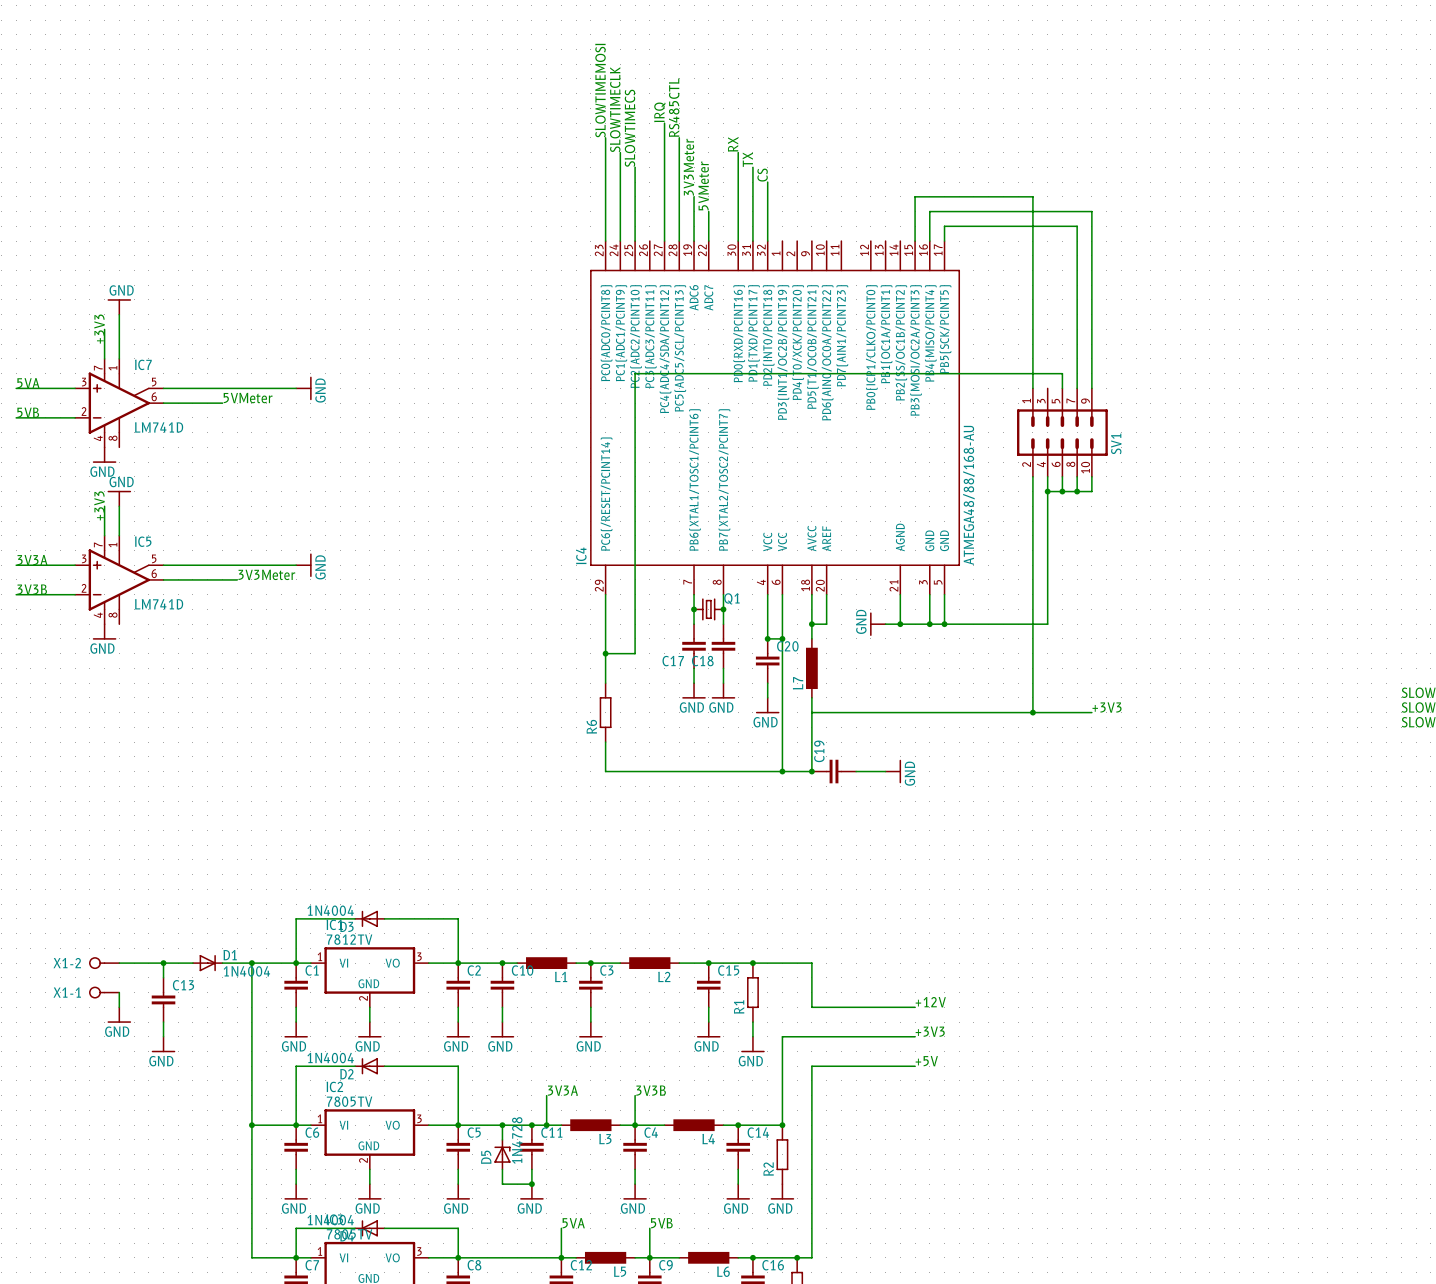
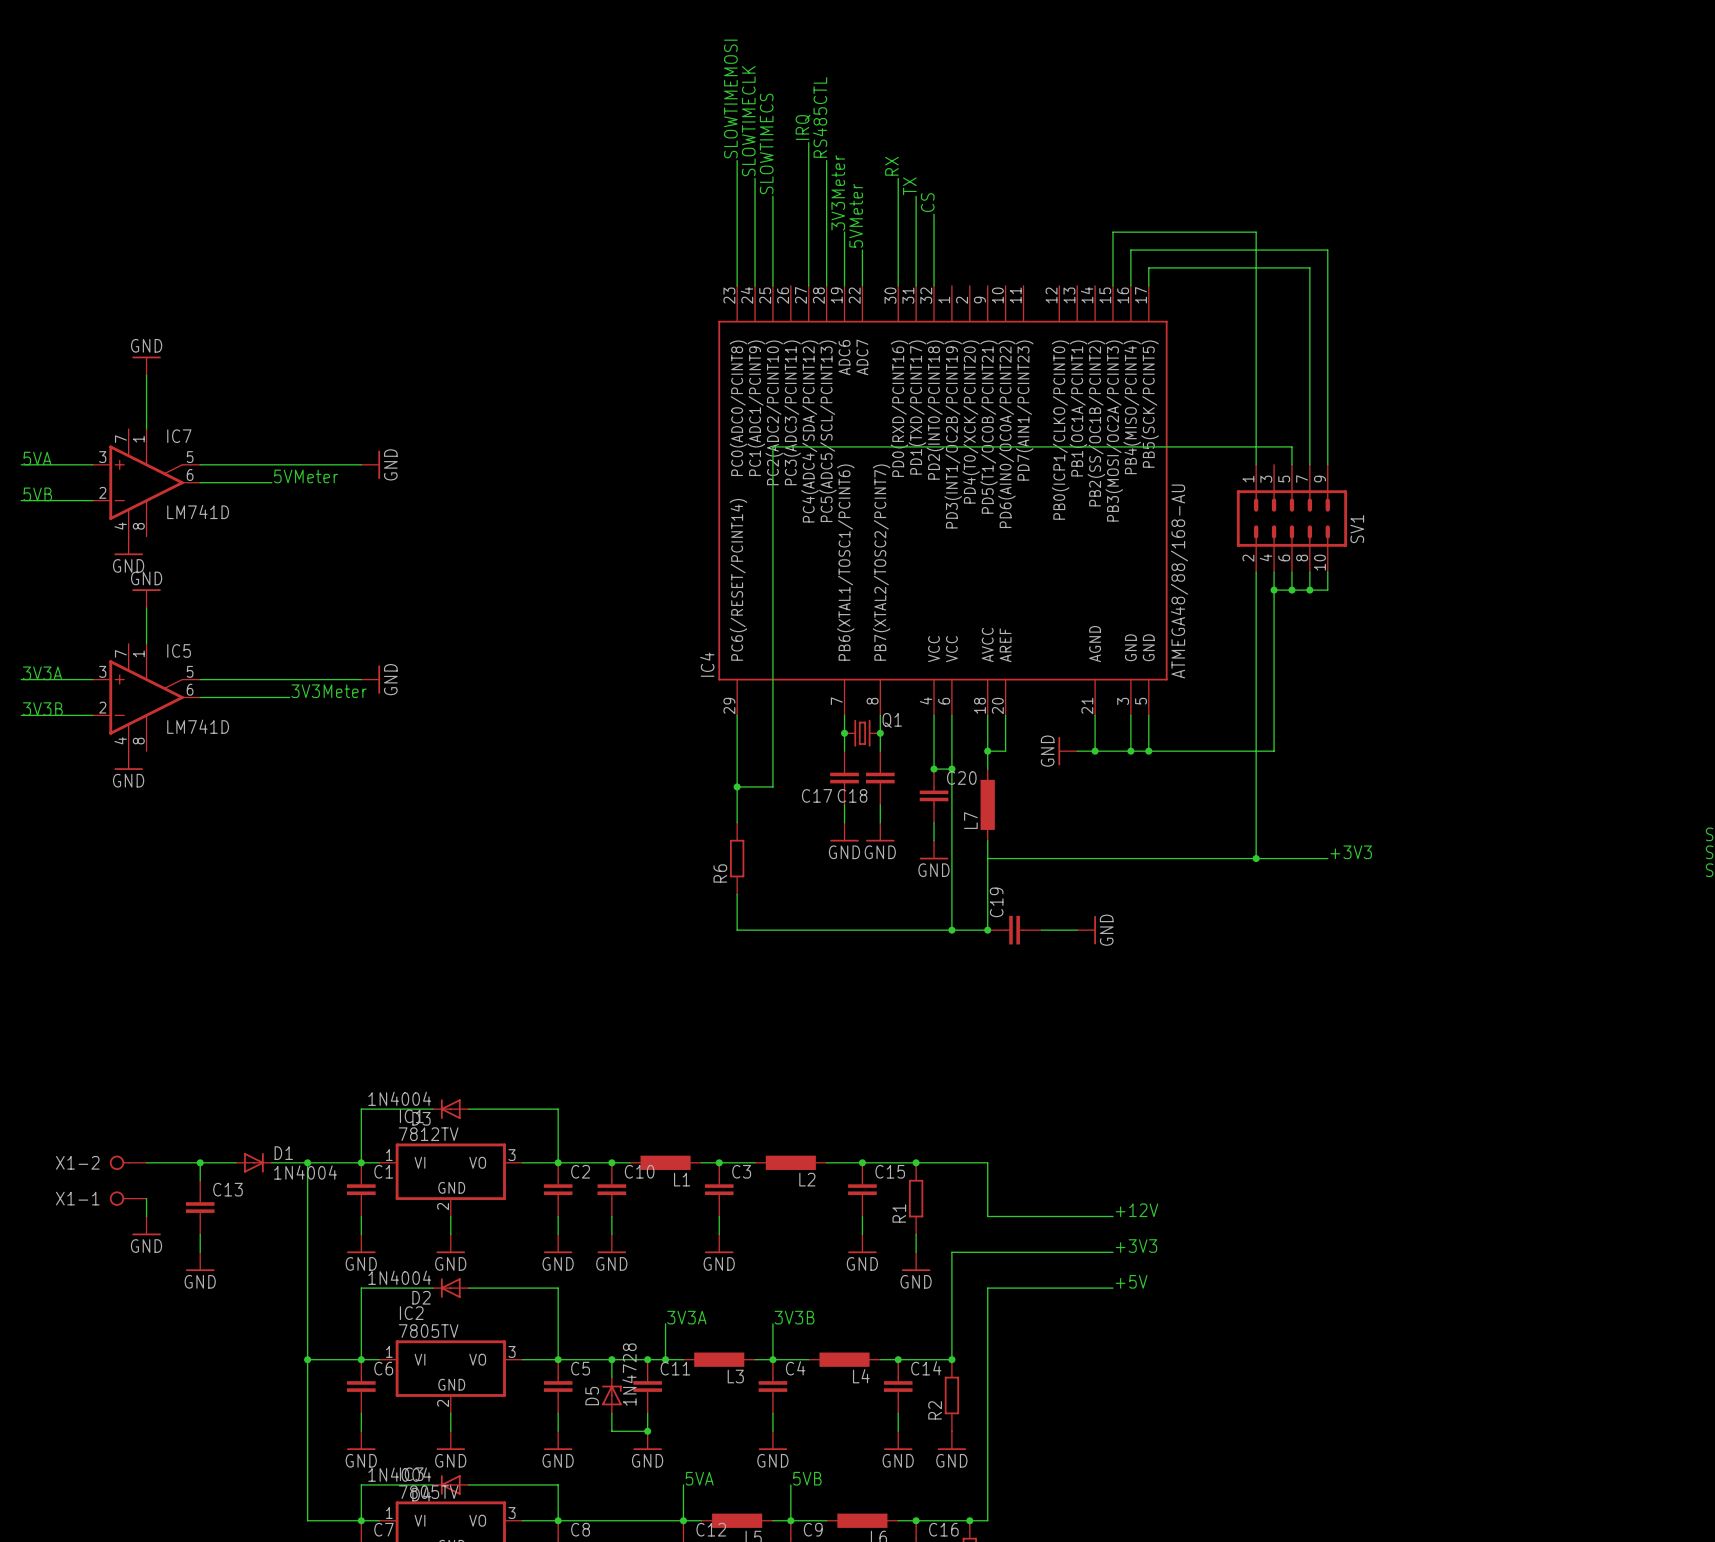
text: +3V3 (99, 329) -> none
wire: (104, 329) (104, 358) -> none
text: +3V3 (99, 505) -> none
wire: (104, 506) (104, 535) -> none

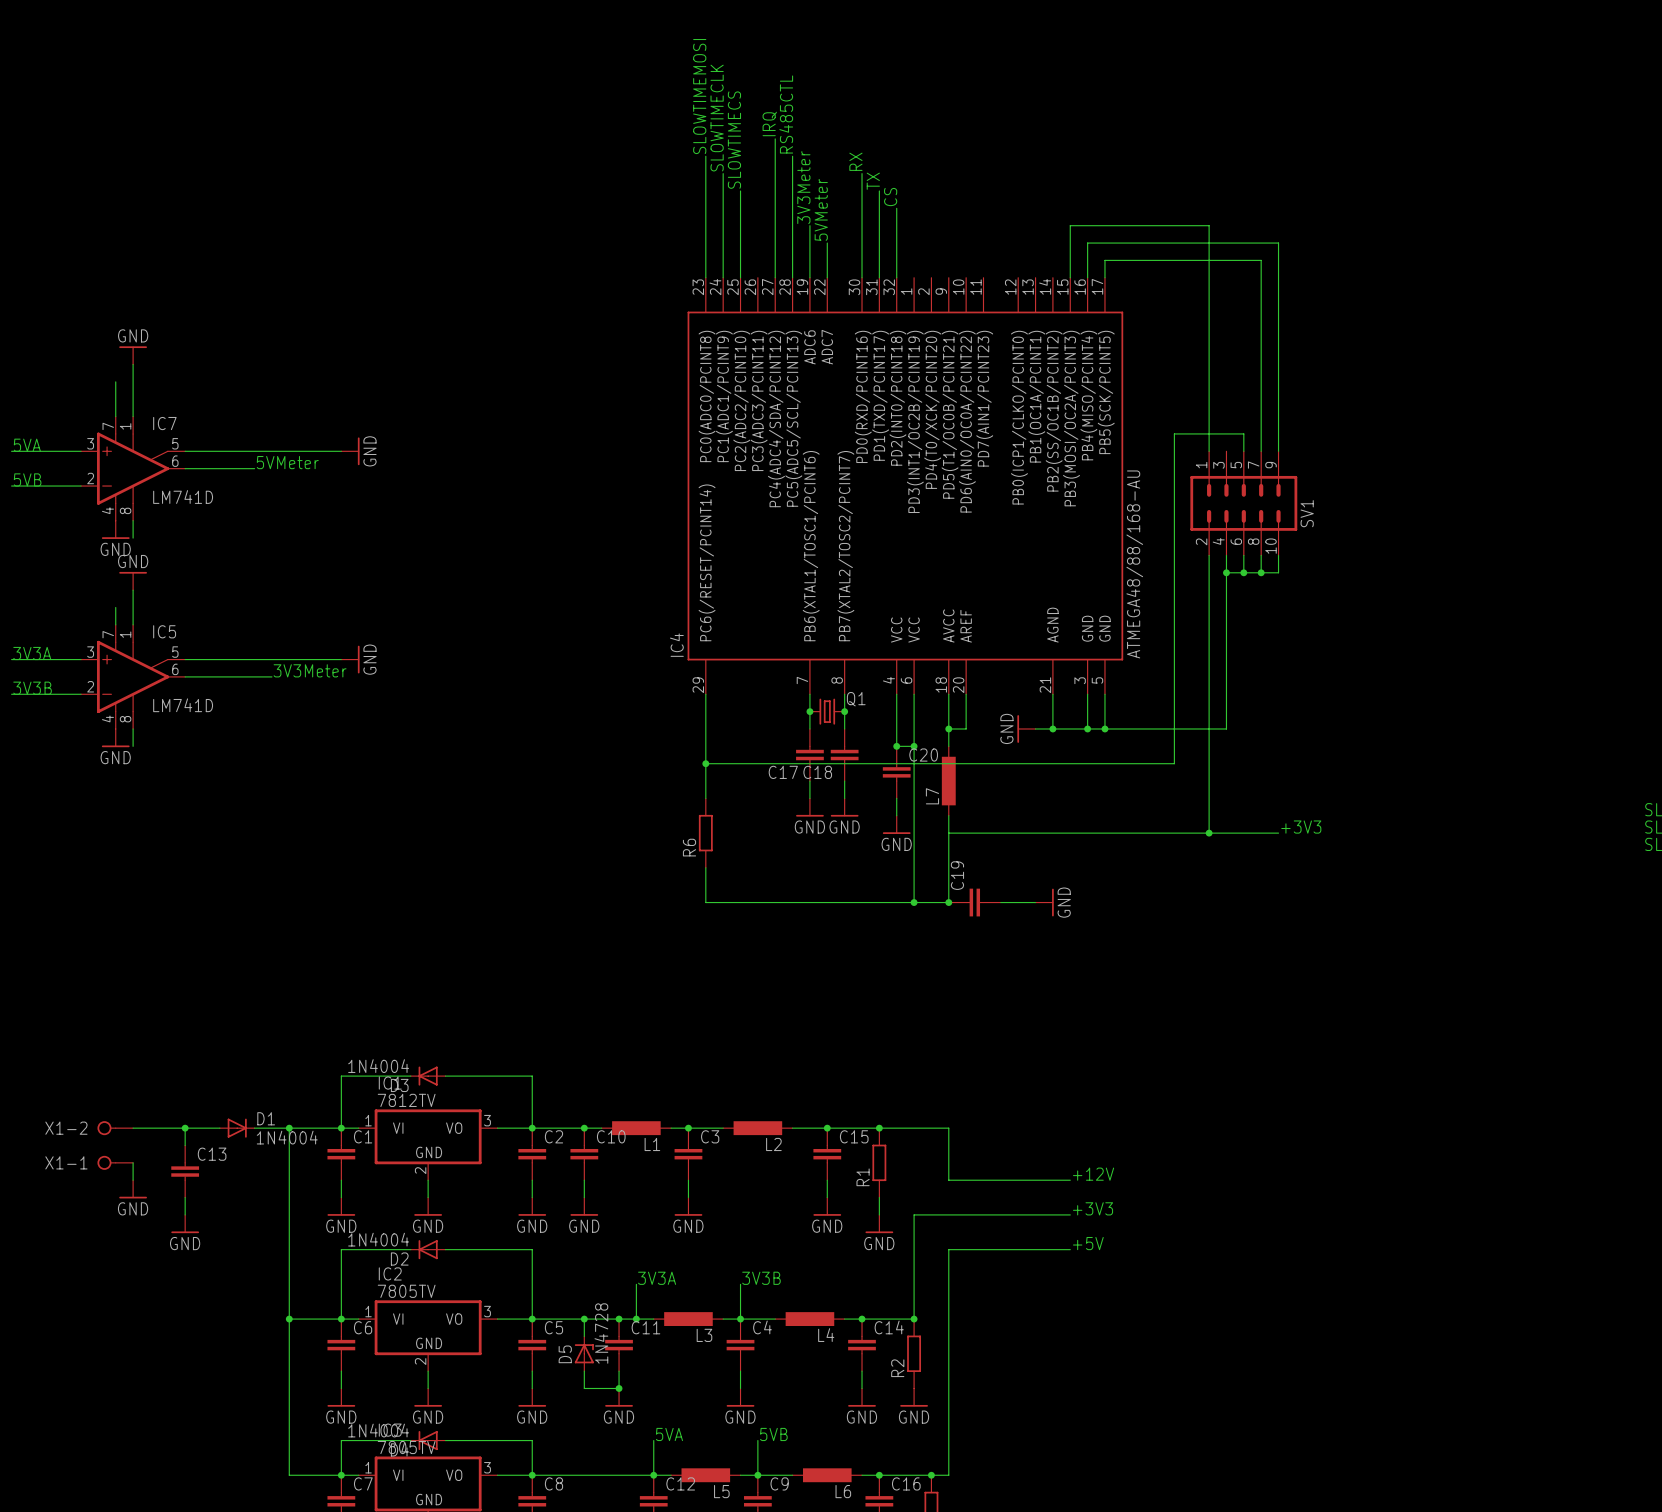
wire: none -> (115, 381) (115, 416)
wire: (1220, 446) (772, 446) (772, 786) -> (1174, 433) (1174, 763) (740, 763)
wire: none -> (133, 520) (133, 538)
wire: none -> (115, 607) (115, 624)
wire: none -> (133, 728) (133, 746)

